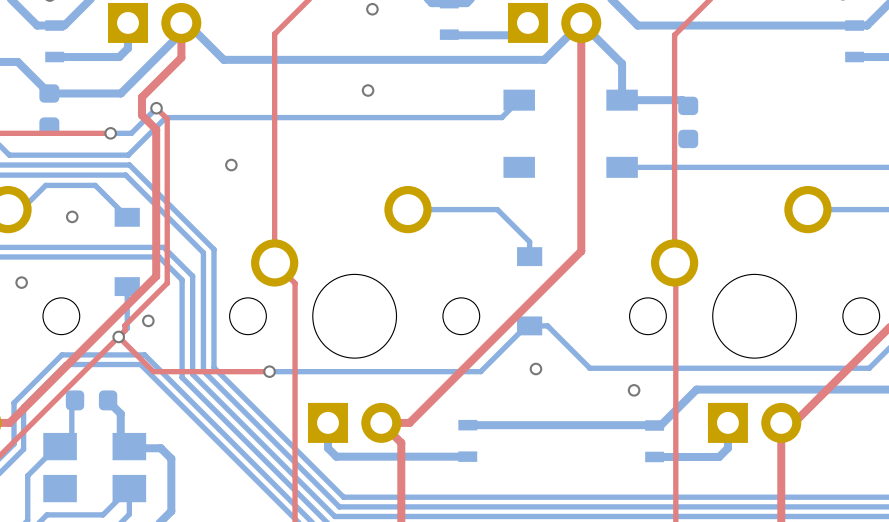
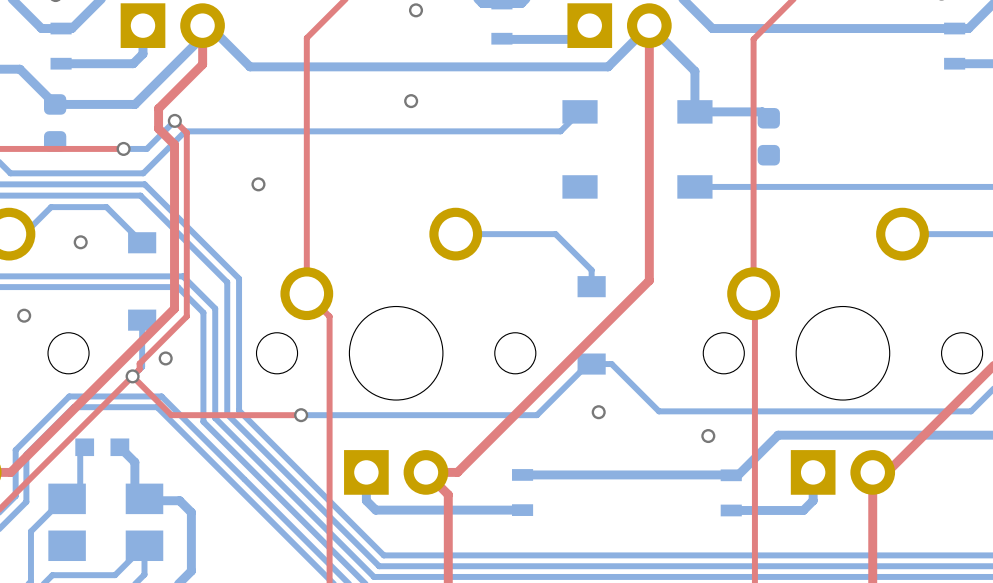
part footprint: [65, 390, 118, 411] -> [75, 438, 130, 457]

